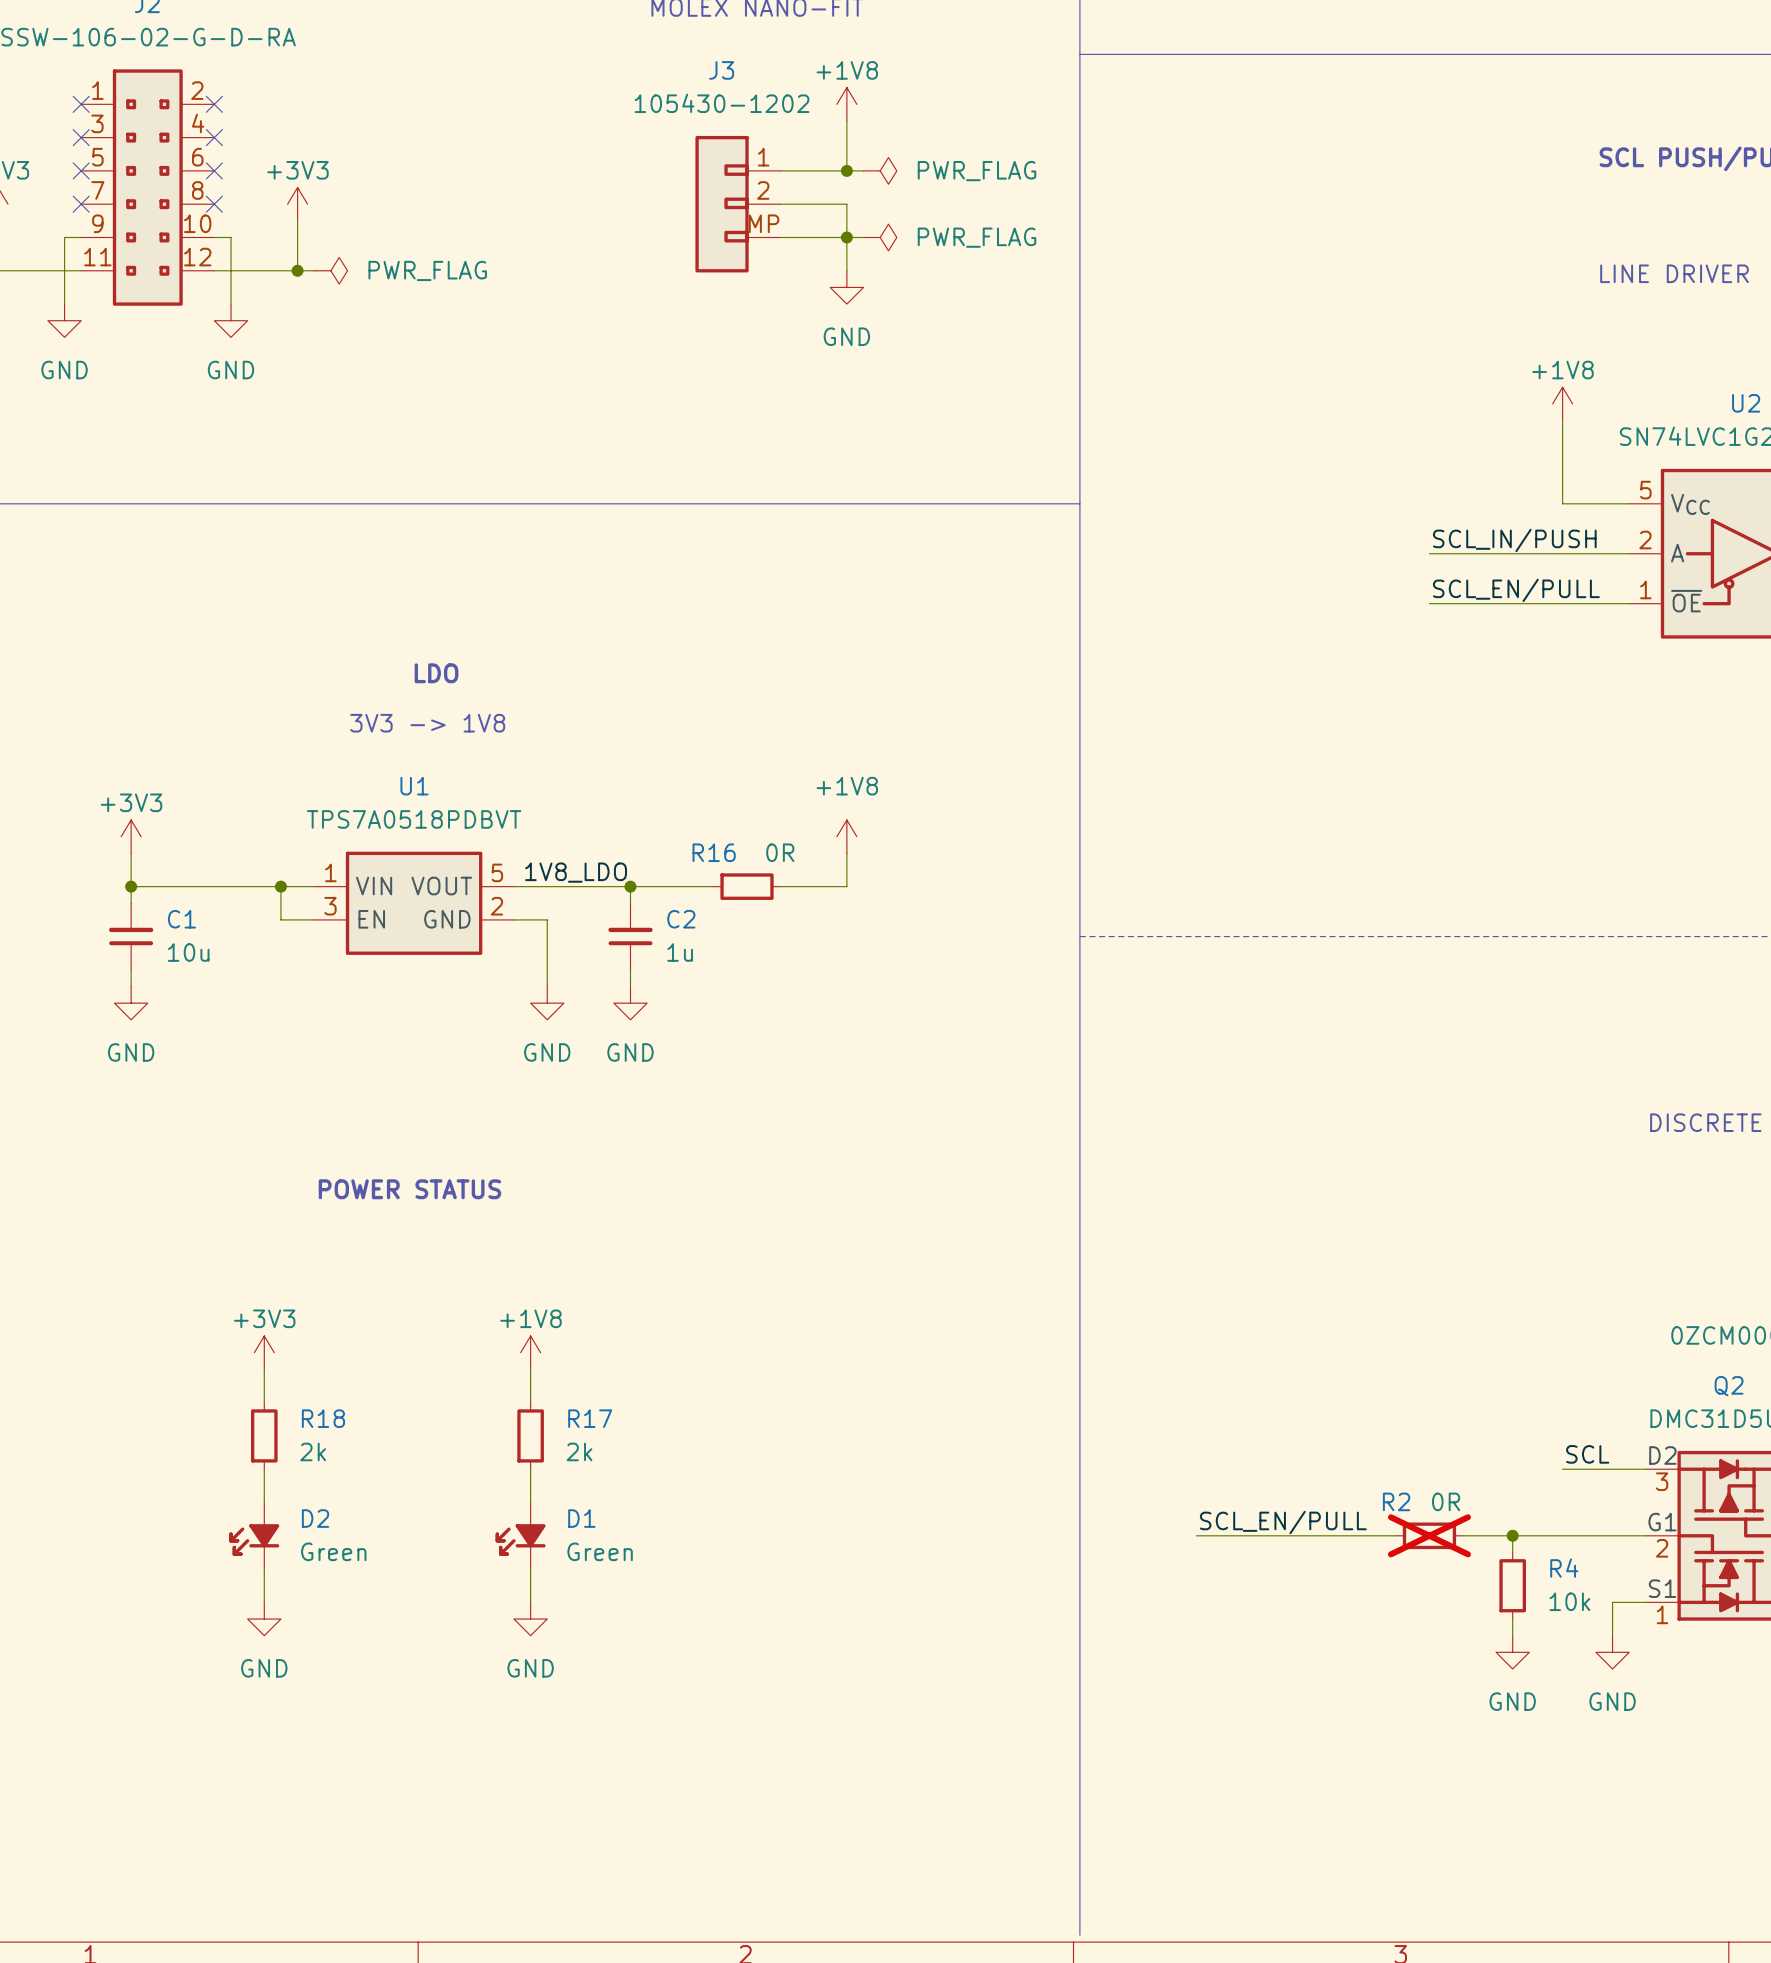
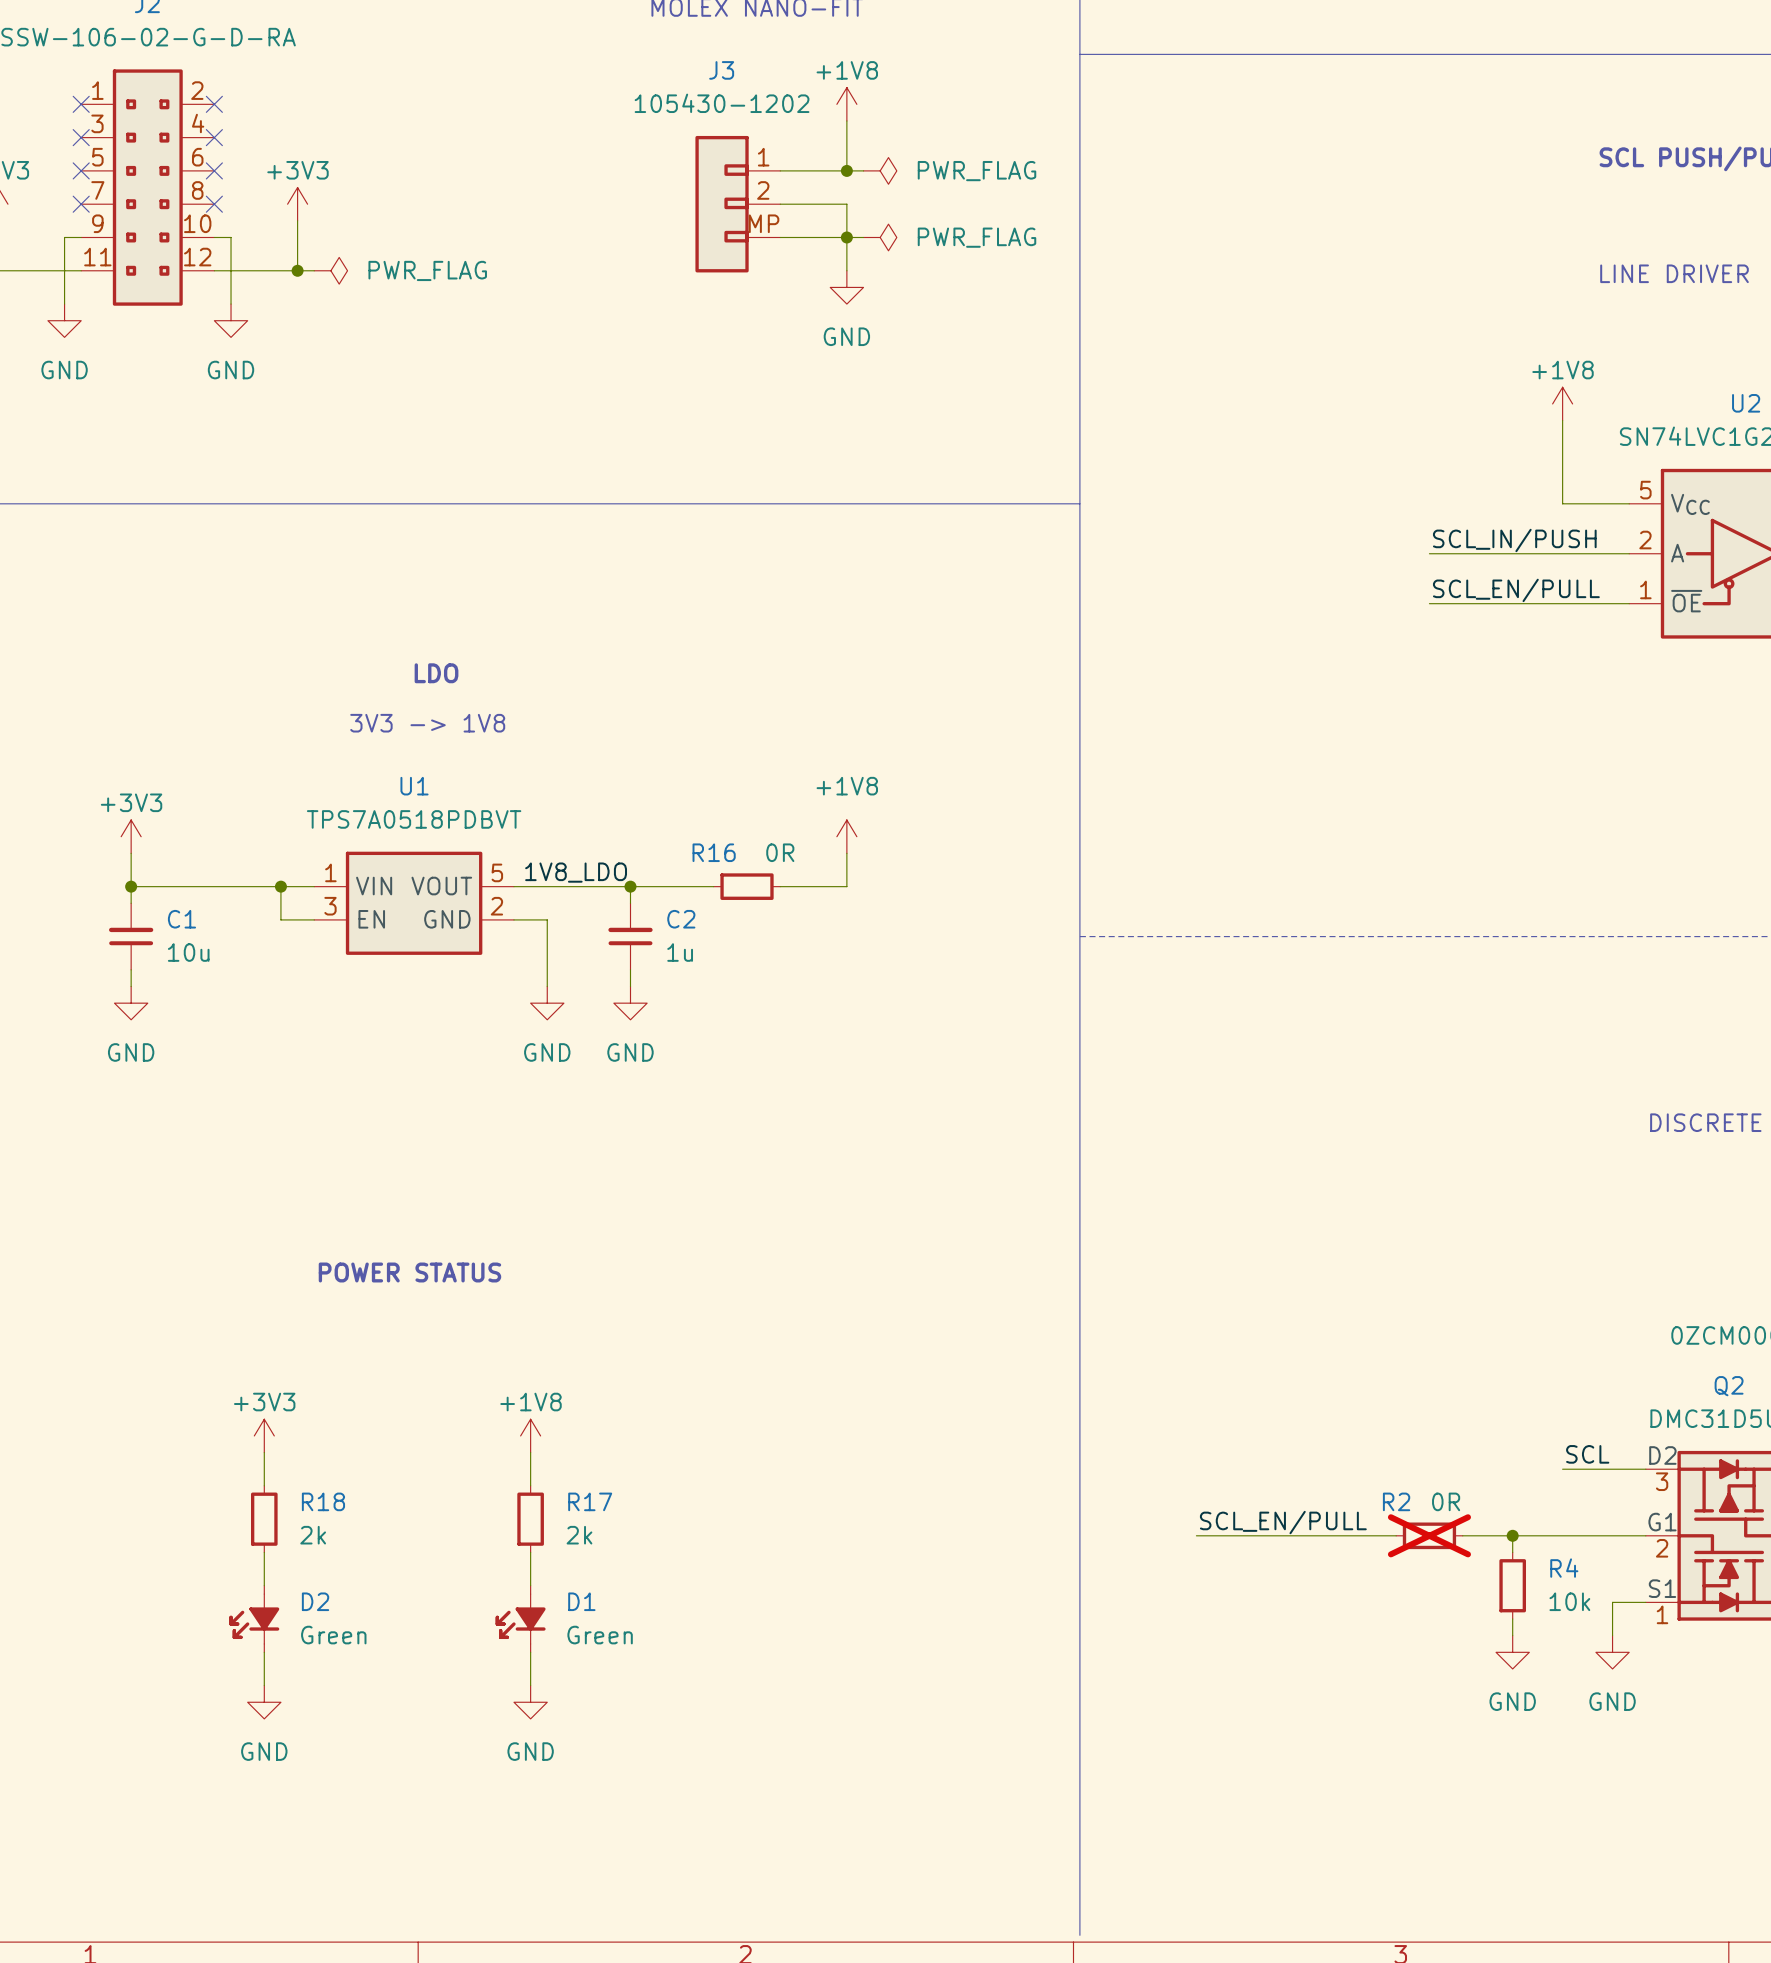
text position: POWER STATUS (409, 1189) -> POWER STATUS (409, 1272)
power symbol position: +3V3 (264, 1352) -> +3V3 (264, 1435)
power symbol position: +1V8 (530, 1352) -> +1V8 (530, 1435)
wire: (264, 1369) (264, 1402) -> (264, 1652) (264, 1685)
wire: (530, 1369) (530, 1402) -> (530, 1652) (530, 1685)
R18 position: (264, 1435) -> (264, 1519)
R17 position: (530, 1435) -> (530, 1519)
D2 position: (254, 1535) -> (254, 1619)
D1 position: (520, 1535) -> (520, 1619)
power symbol position: GND (264, 1619) -> GND (264, 1702)
power symbol position: GND (530, 1619) -> GND (530, 1702)

